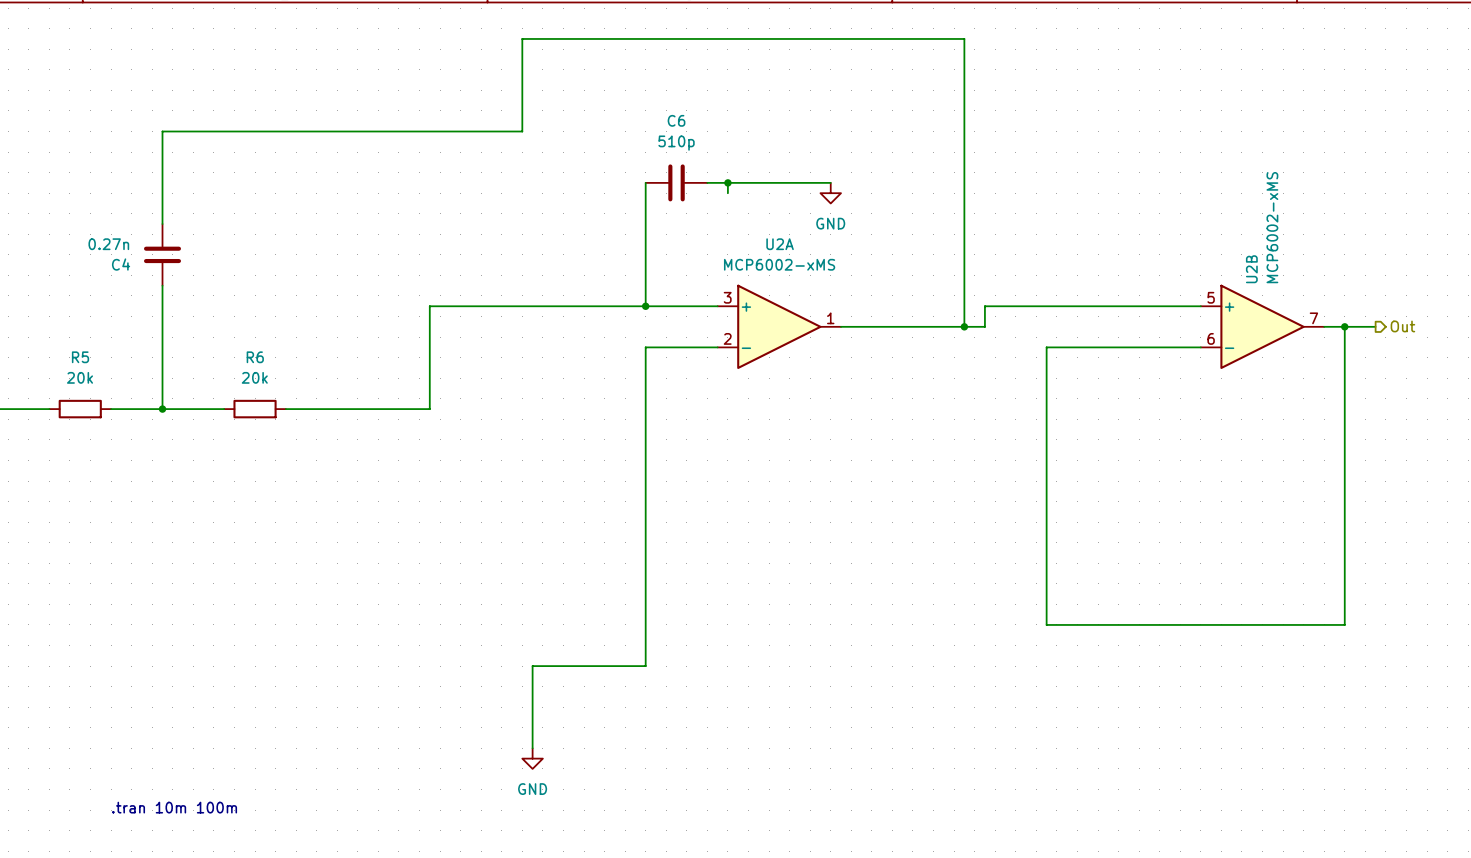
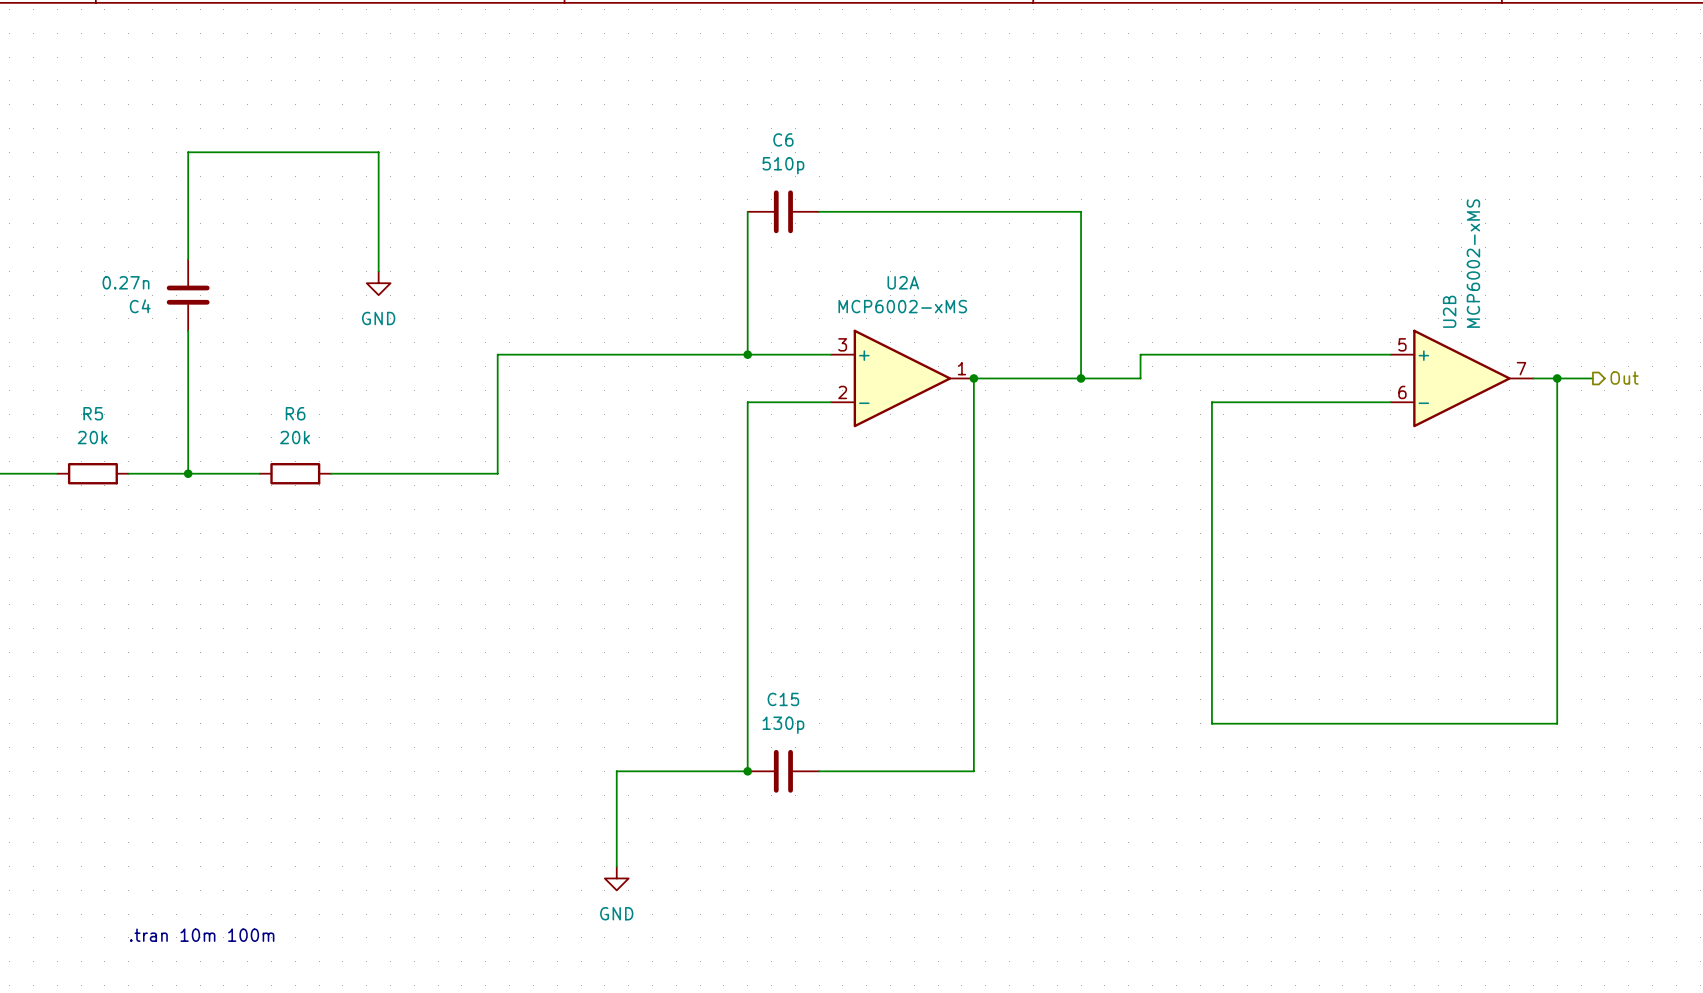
wire: (326, 131) (522, 131) (522, 38) (964, 38) (964, 326) -> (378, 152) (378, 271)
wire: (727, 182) (727, 193) -> none
junction: (727, 182) -> none
wire: none -> (961, 211) (1081, 211) (1081, 378)
power symbol: GND (830, 193) -> none
power symbol: none -> GND (378, 283)
wire: none -> (973, 378) (973, 771) (819, 771)
junction: none -> (973, 378)
junction position: (964, 326) -> (1081, 378)
junction: none -> (747, 771)
C15: none -> 130p (783, 771)

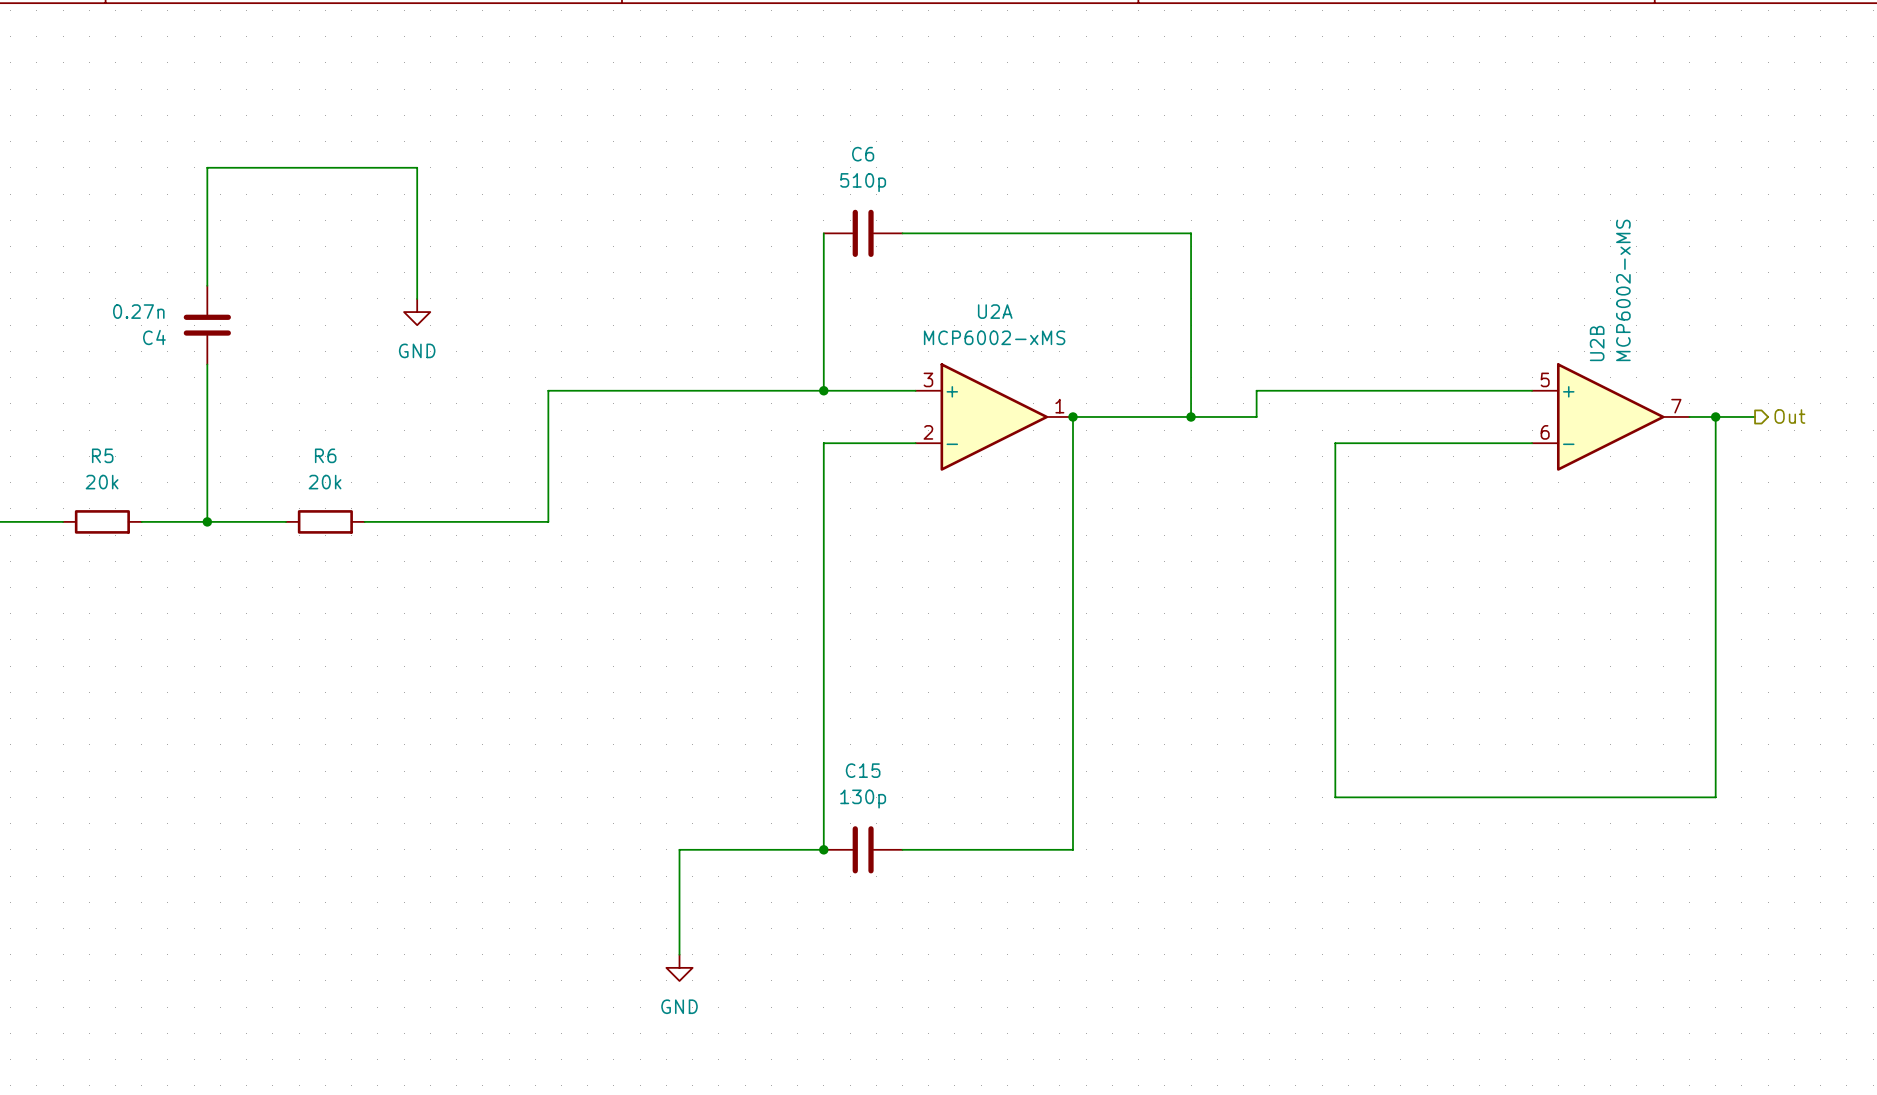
text: .tran 10m 100m (202, 935) -> none

